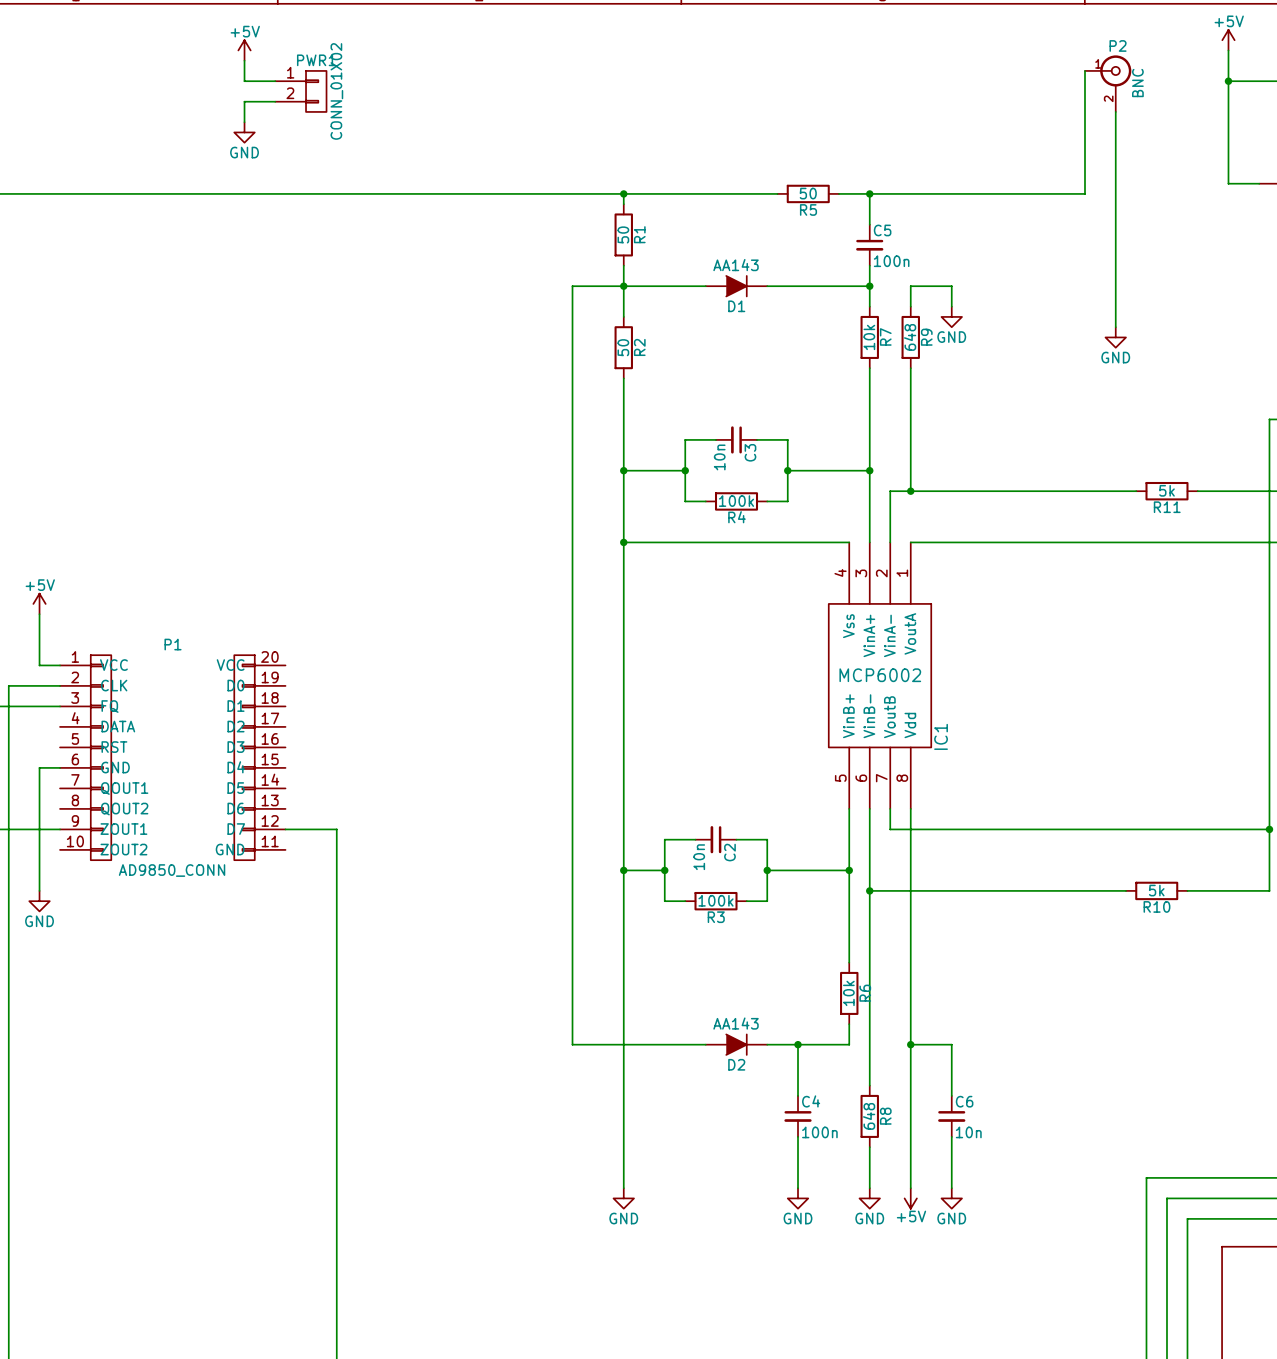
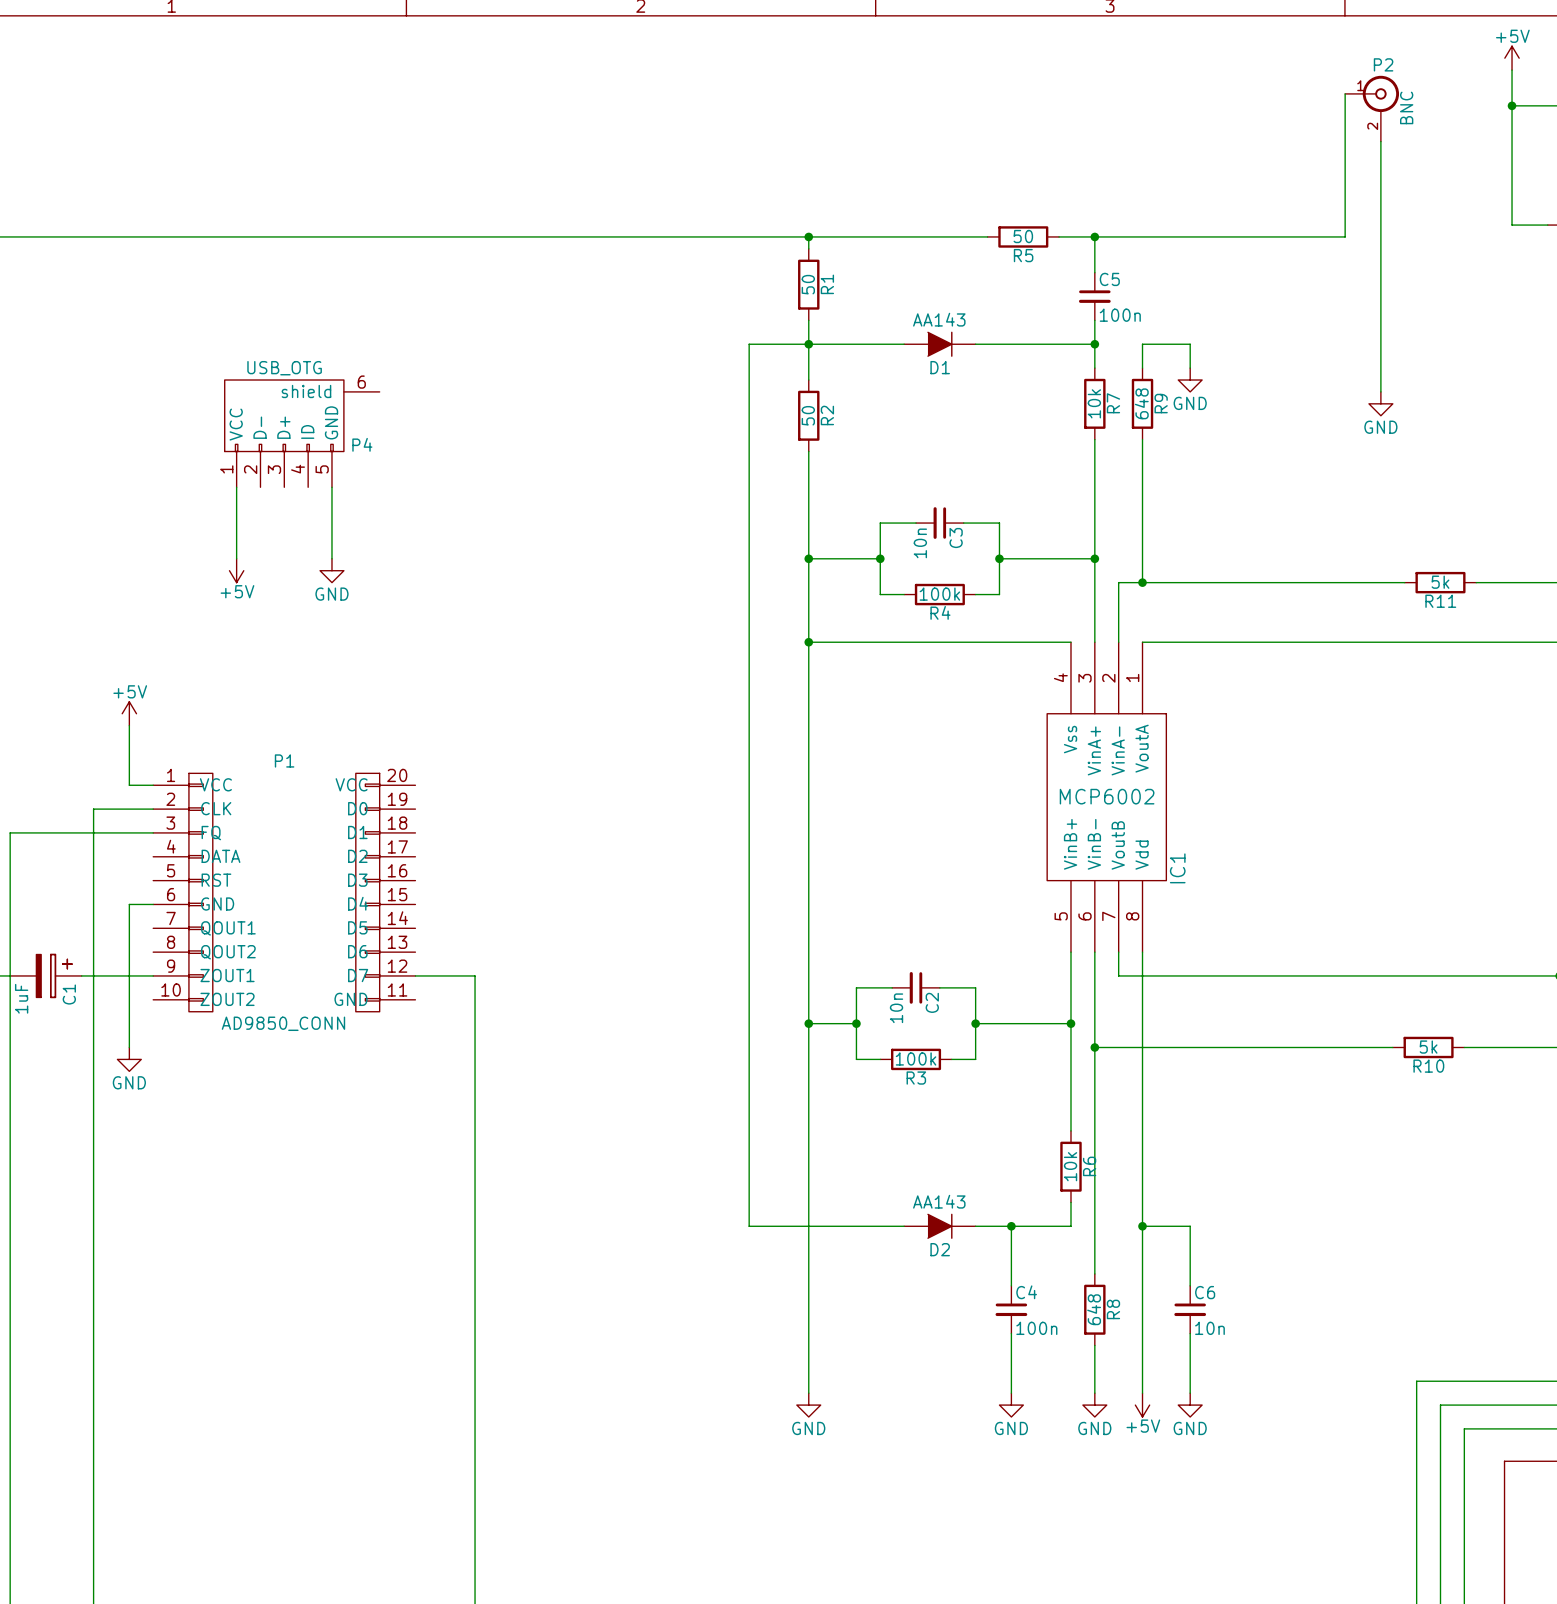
power symbol: +5V (244, 50) -> none
wire: (244, 60) (244, 81) (275, 81) -> none
PWR1: CONN_01X02 (300, 91) -> none
wire: (275, 101) (244, 101) (244, 122) -> none
power symbol: GND (244, 132) -> none
P4: none -> USB_OTG (302, 433)
wire: none -> (236, 487) (236, 558)
wire: none -> (331, 487) (331, 558)
power symbol: none -> +5V (236, 570)
power symbol: none -> GND (331, 570)

